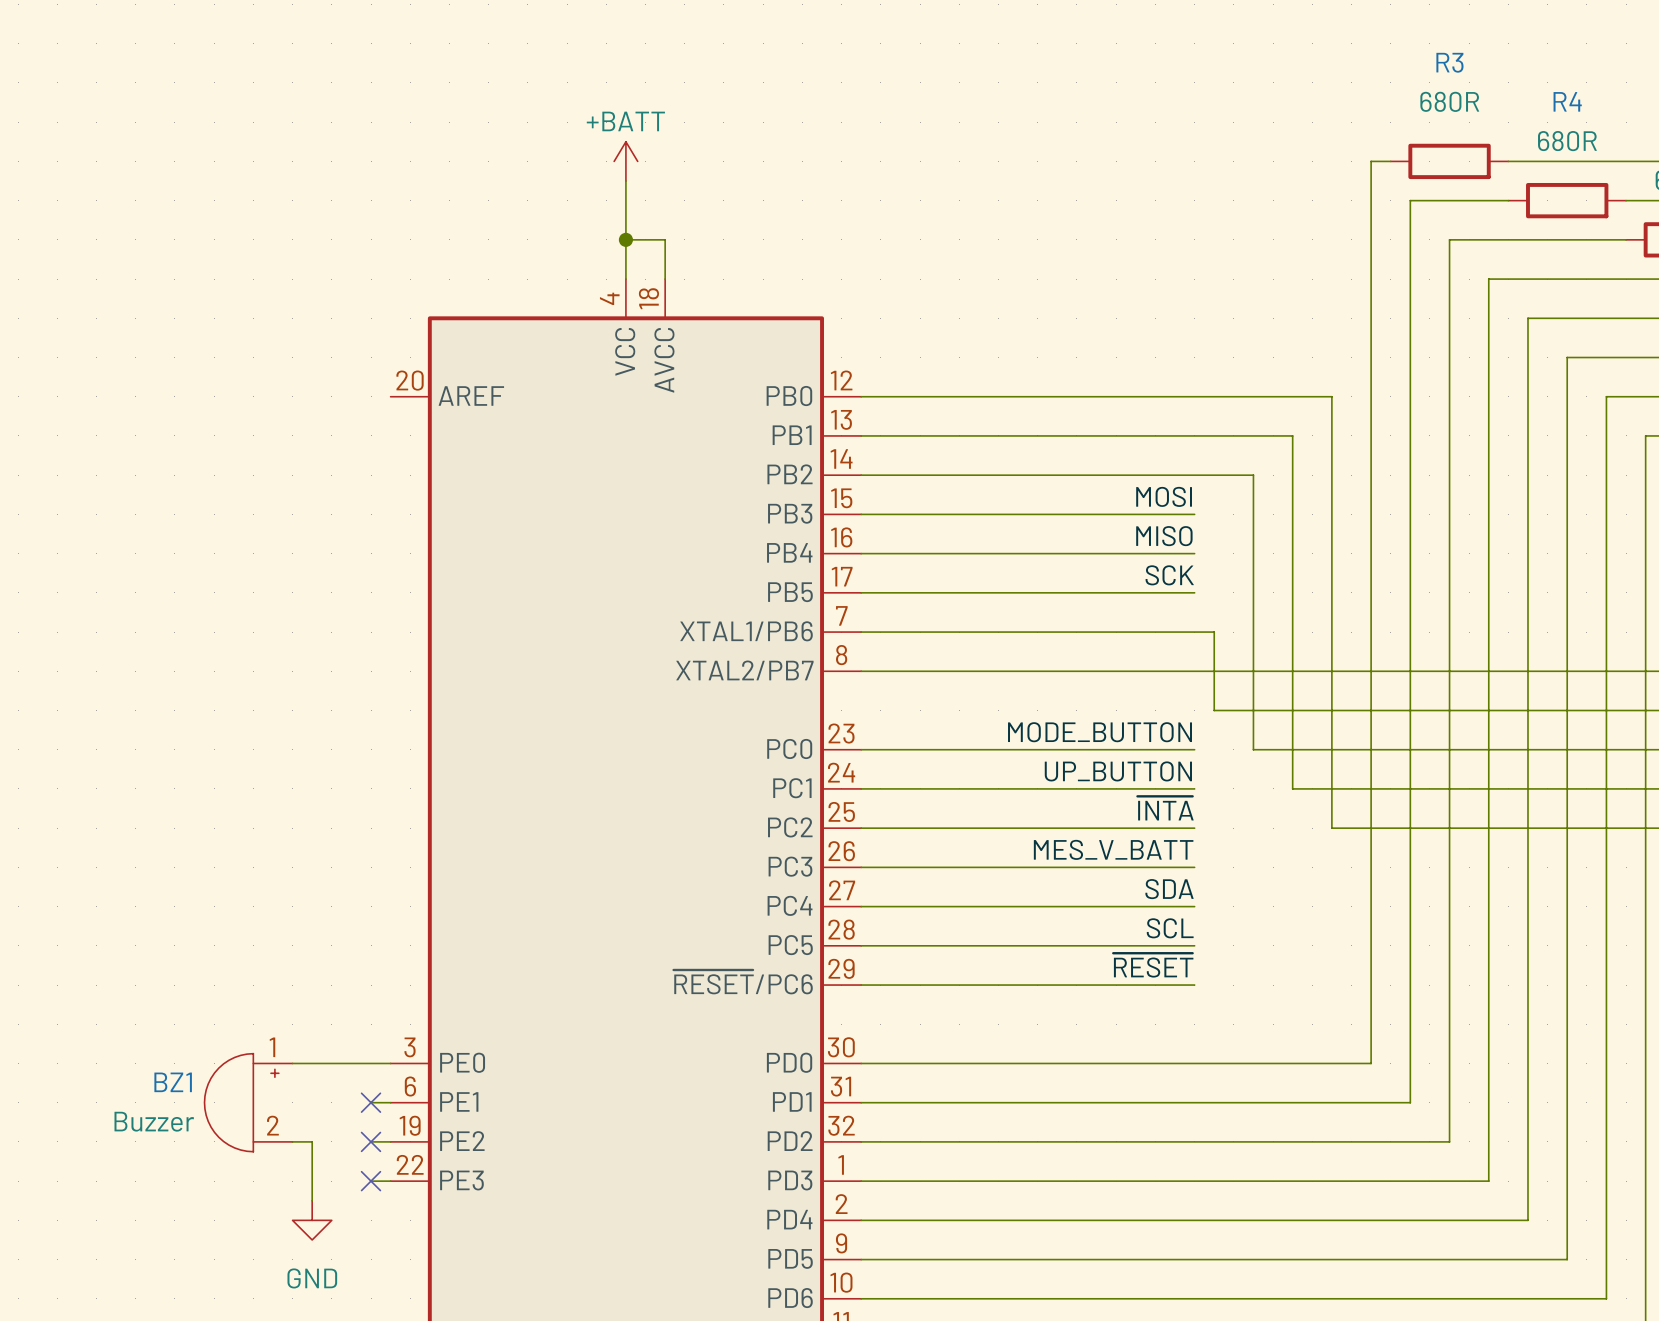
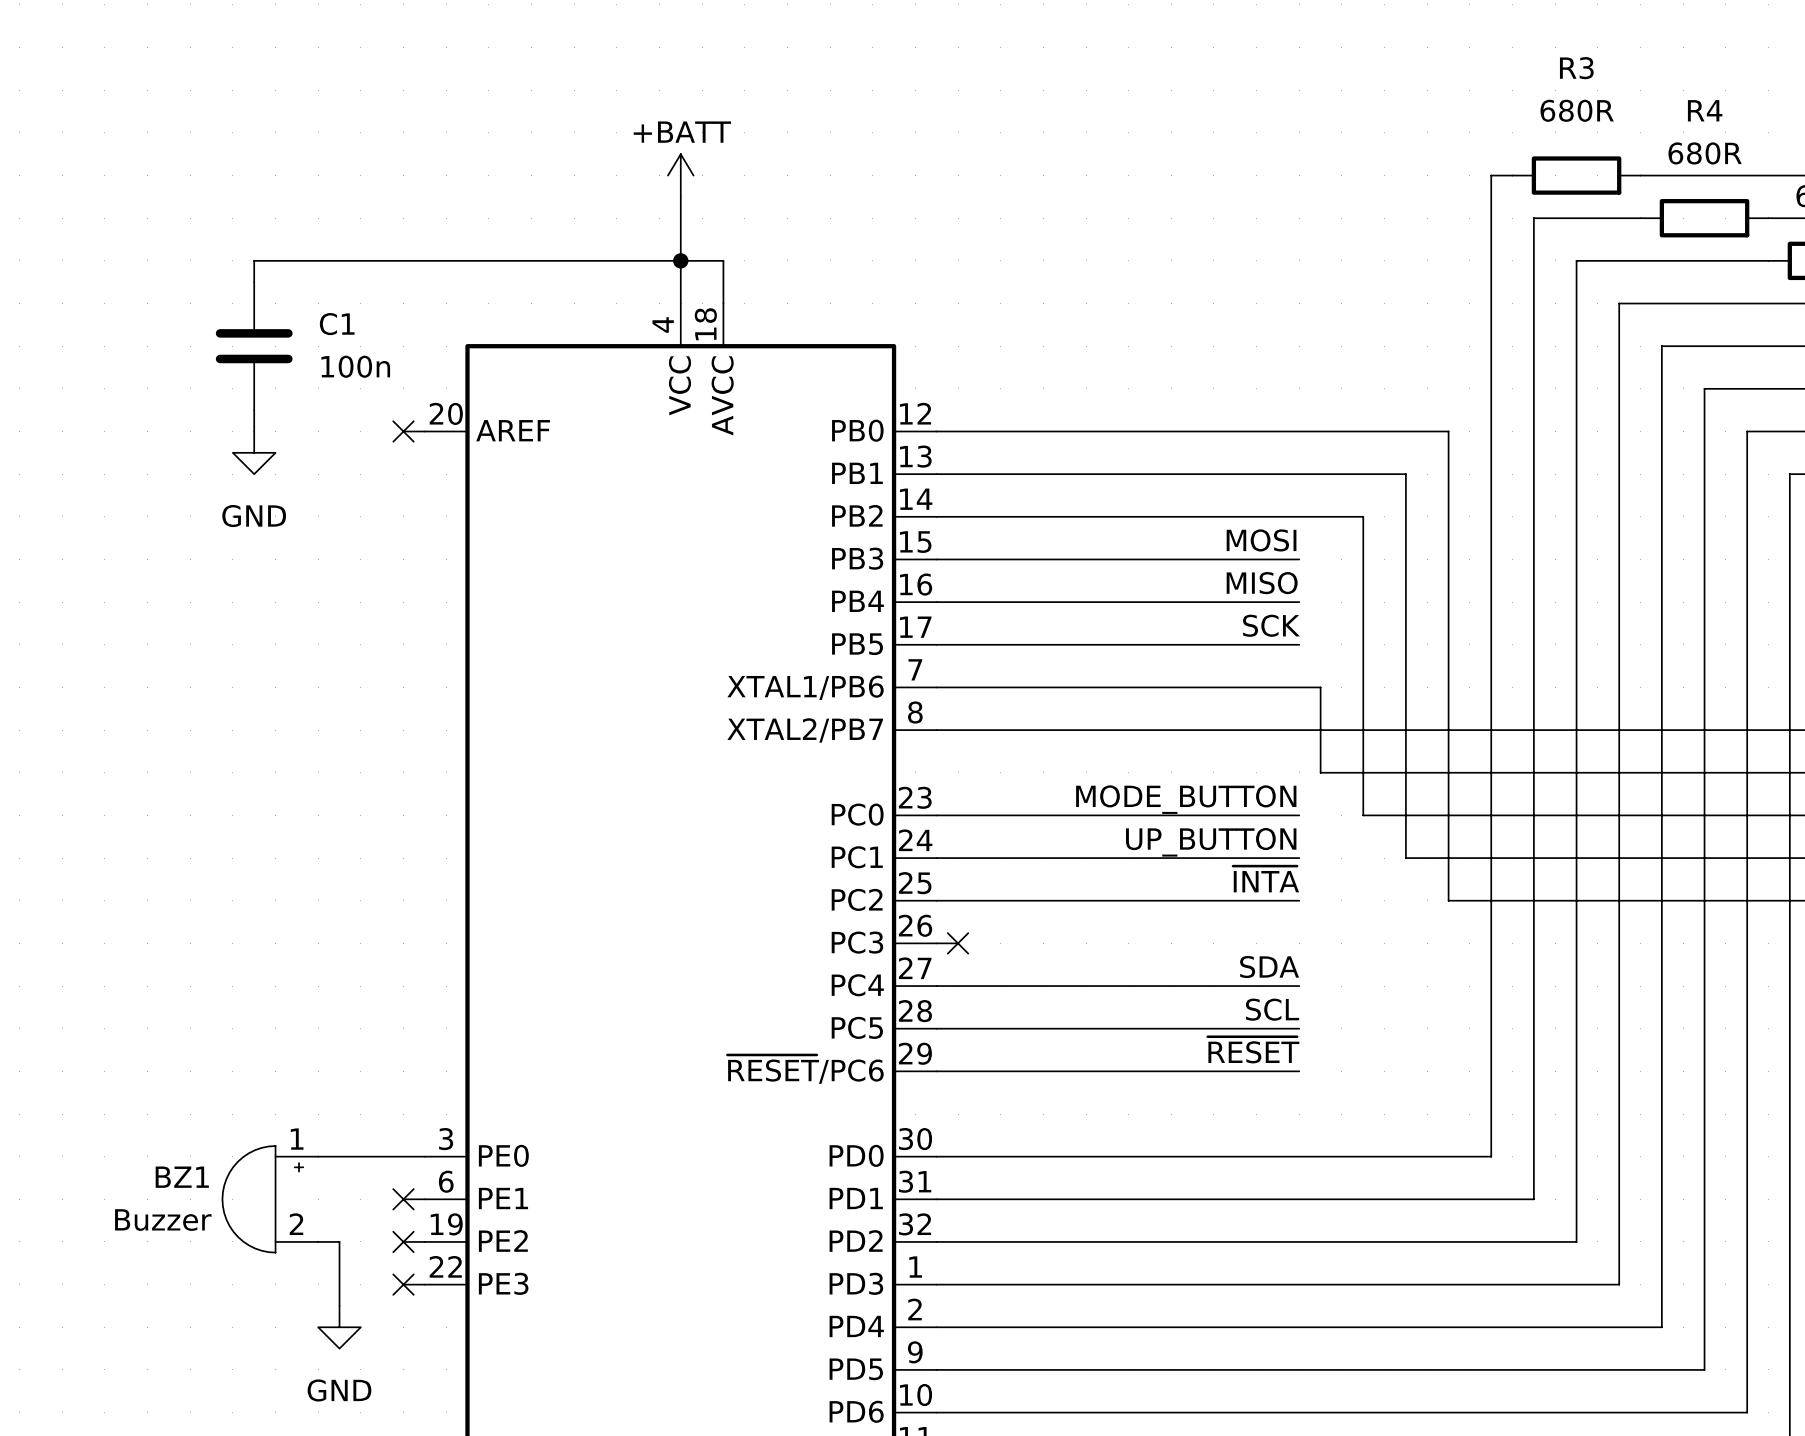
wire: none -> (680, 260) (254, 260) (254, 282)
C1: none -> 100n (254, 346)
wire: none -> (254, 410) (254, 431)
wire: none -> (403, 431) (424, 431)
no-connect mark: none -> (403, 431)
power symbol: none -> GND (254, 452)
label: MES_V_BATT (1113, 849) -> none
wire: (880, 867) (1194, 867) -> none
no-connect mark: none -> (958, 943)

